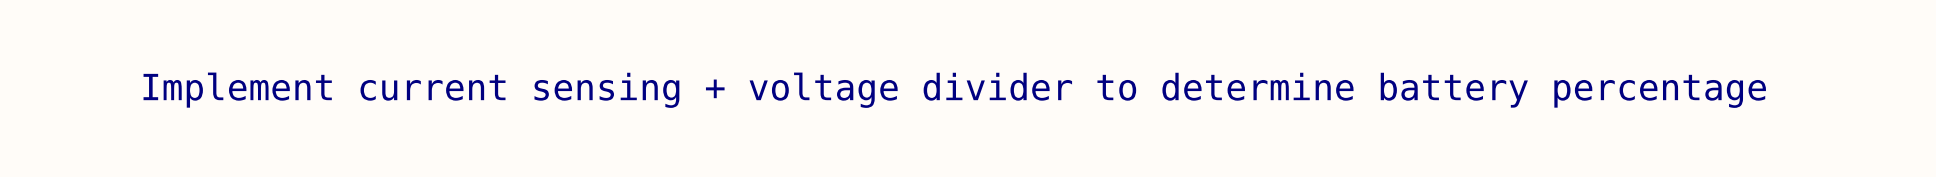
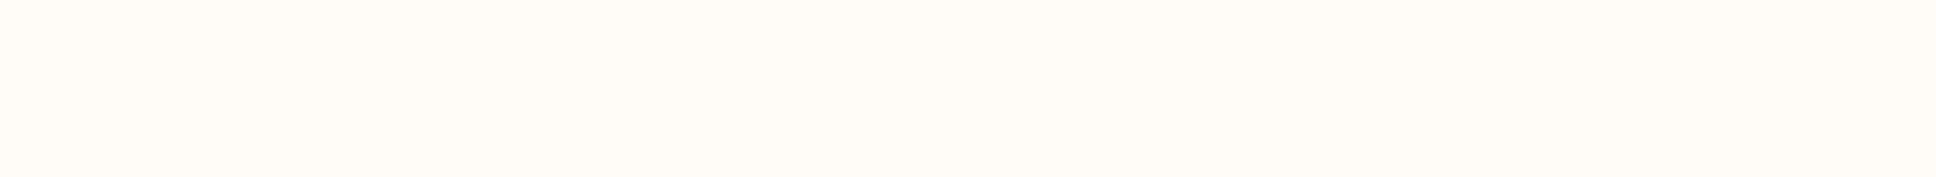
text: Implement current sensing + voltage divider to determine battery percentage (954, 90) -> none

